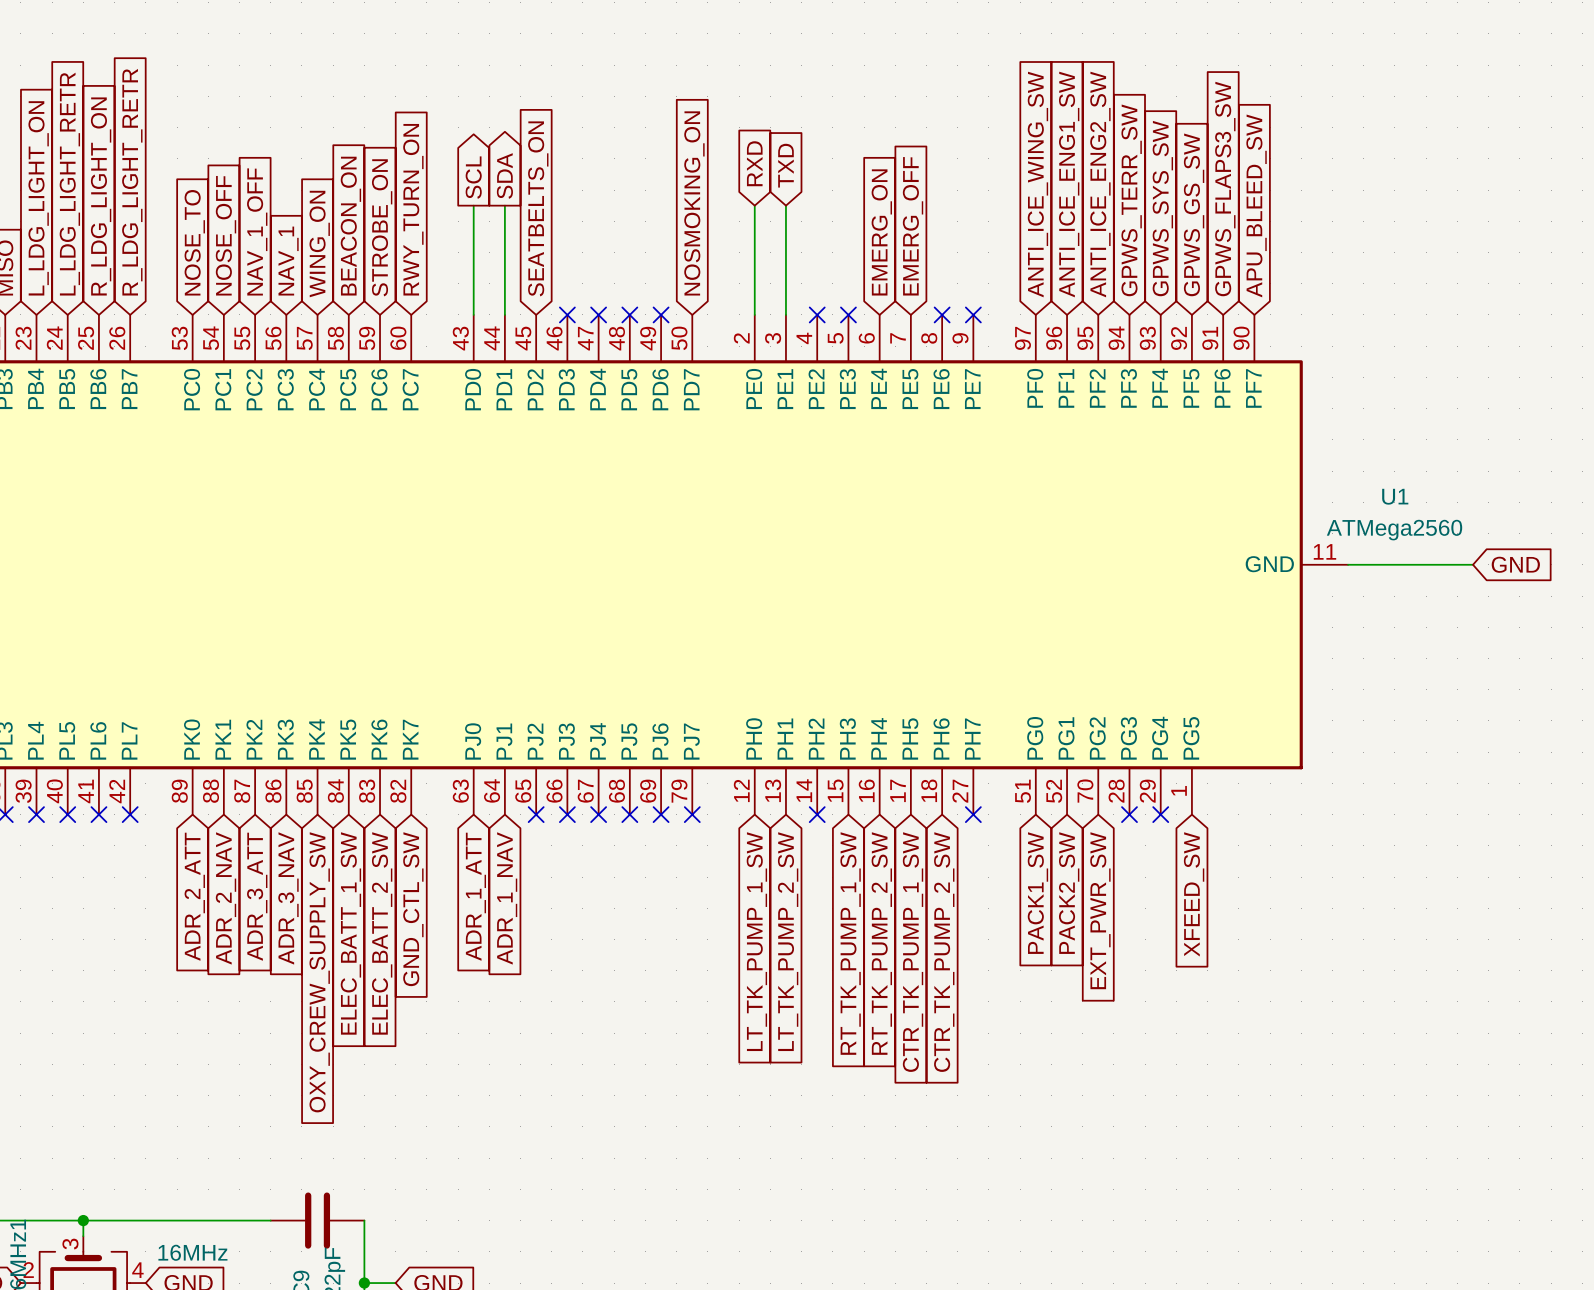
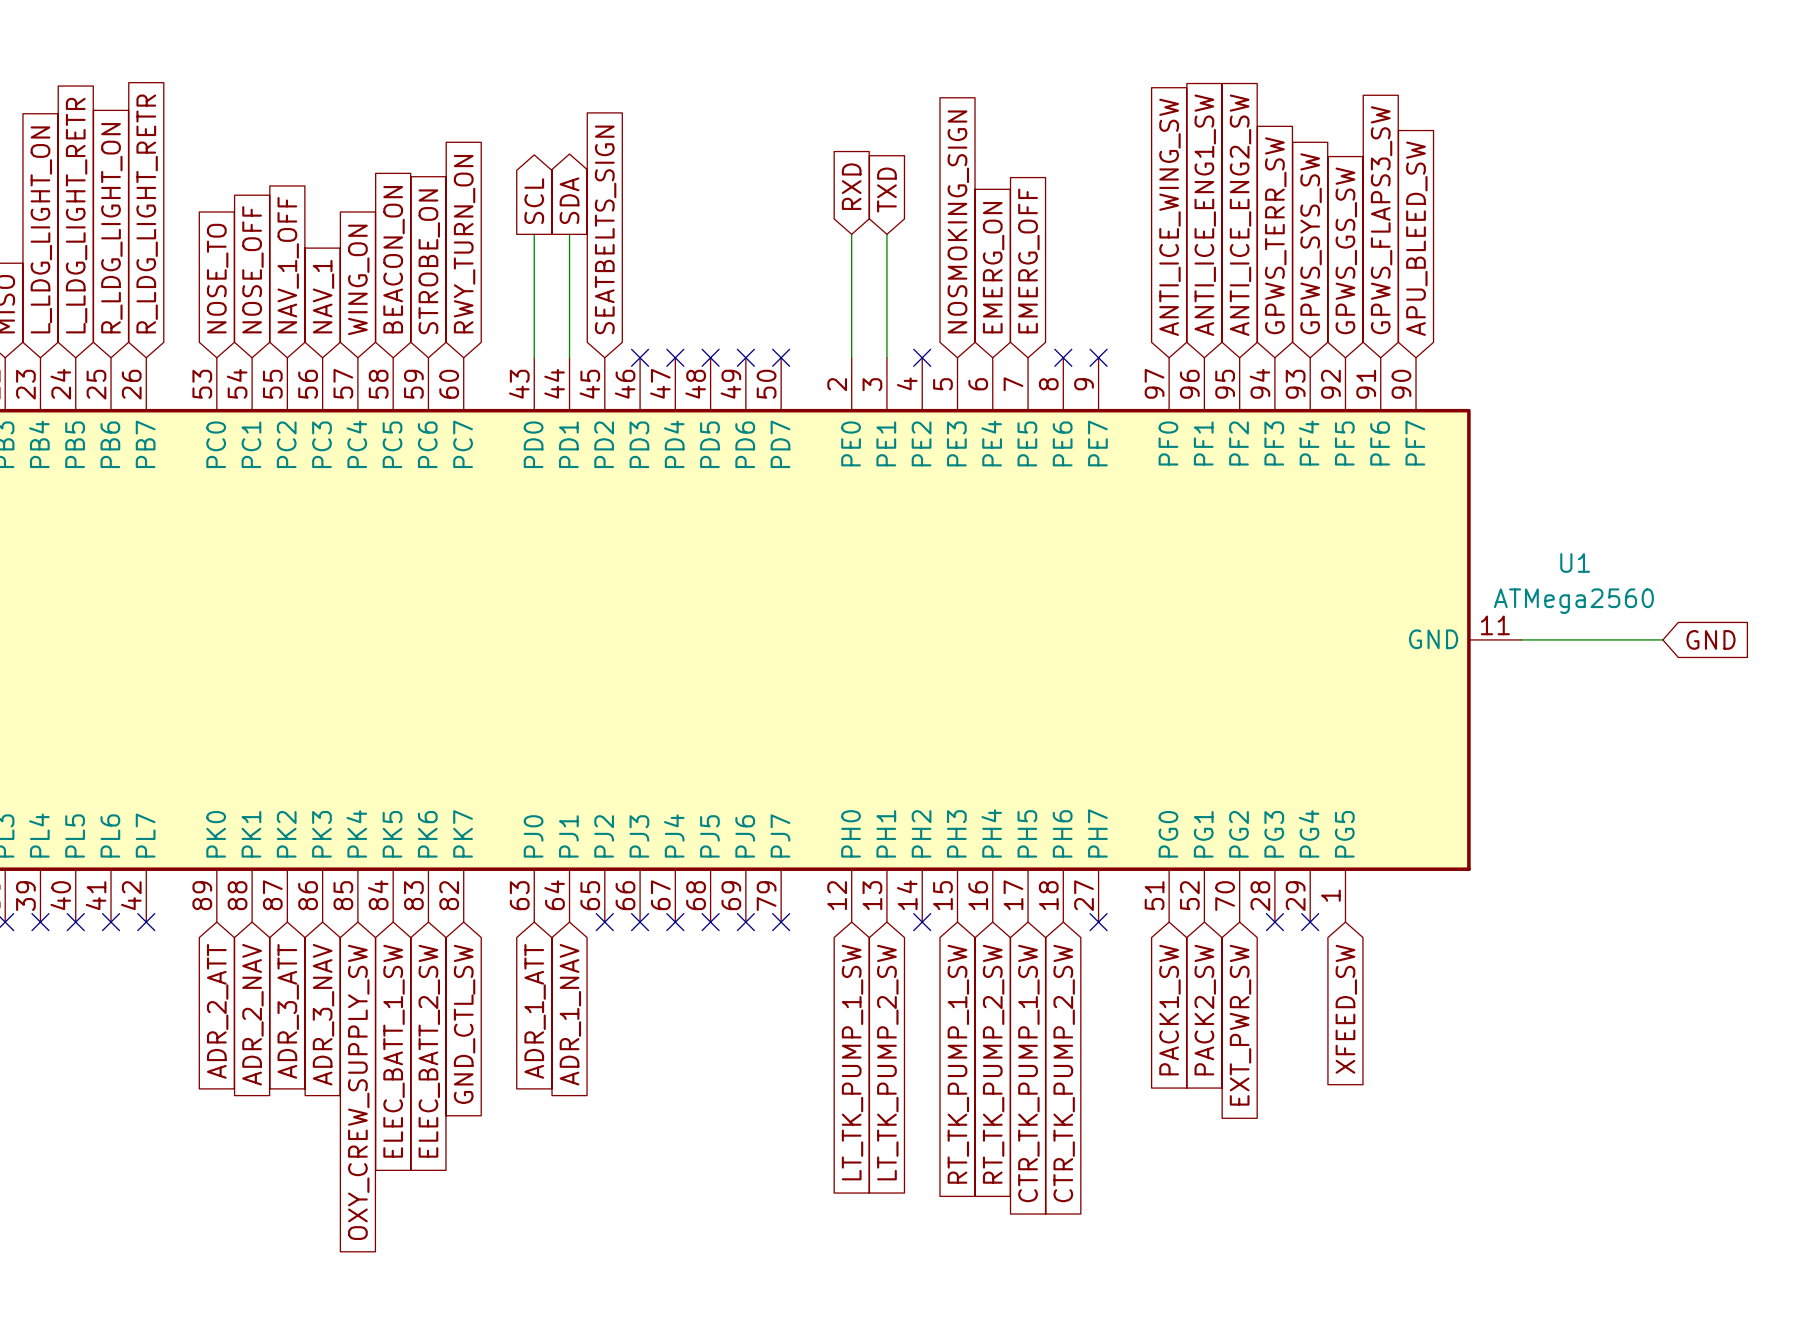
global label: none -> NOSMOKING_SIGN (958, 221)
global label: NOSMOKING_ON (694, 203) -> none
global label: SEATBELTS_ON (538, 208) -> SEATBELTS_SIGN (605, 229)
no-connect mark: none -> (781, 357)
no-connect mark: (848, 314) -> none

